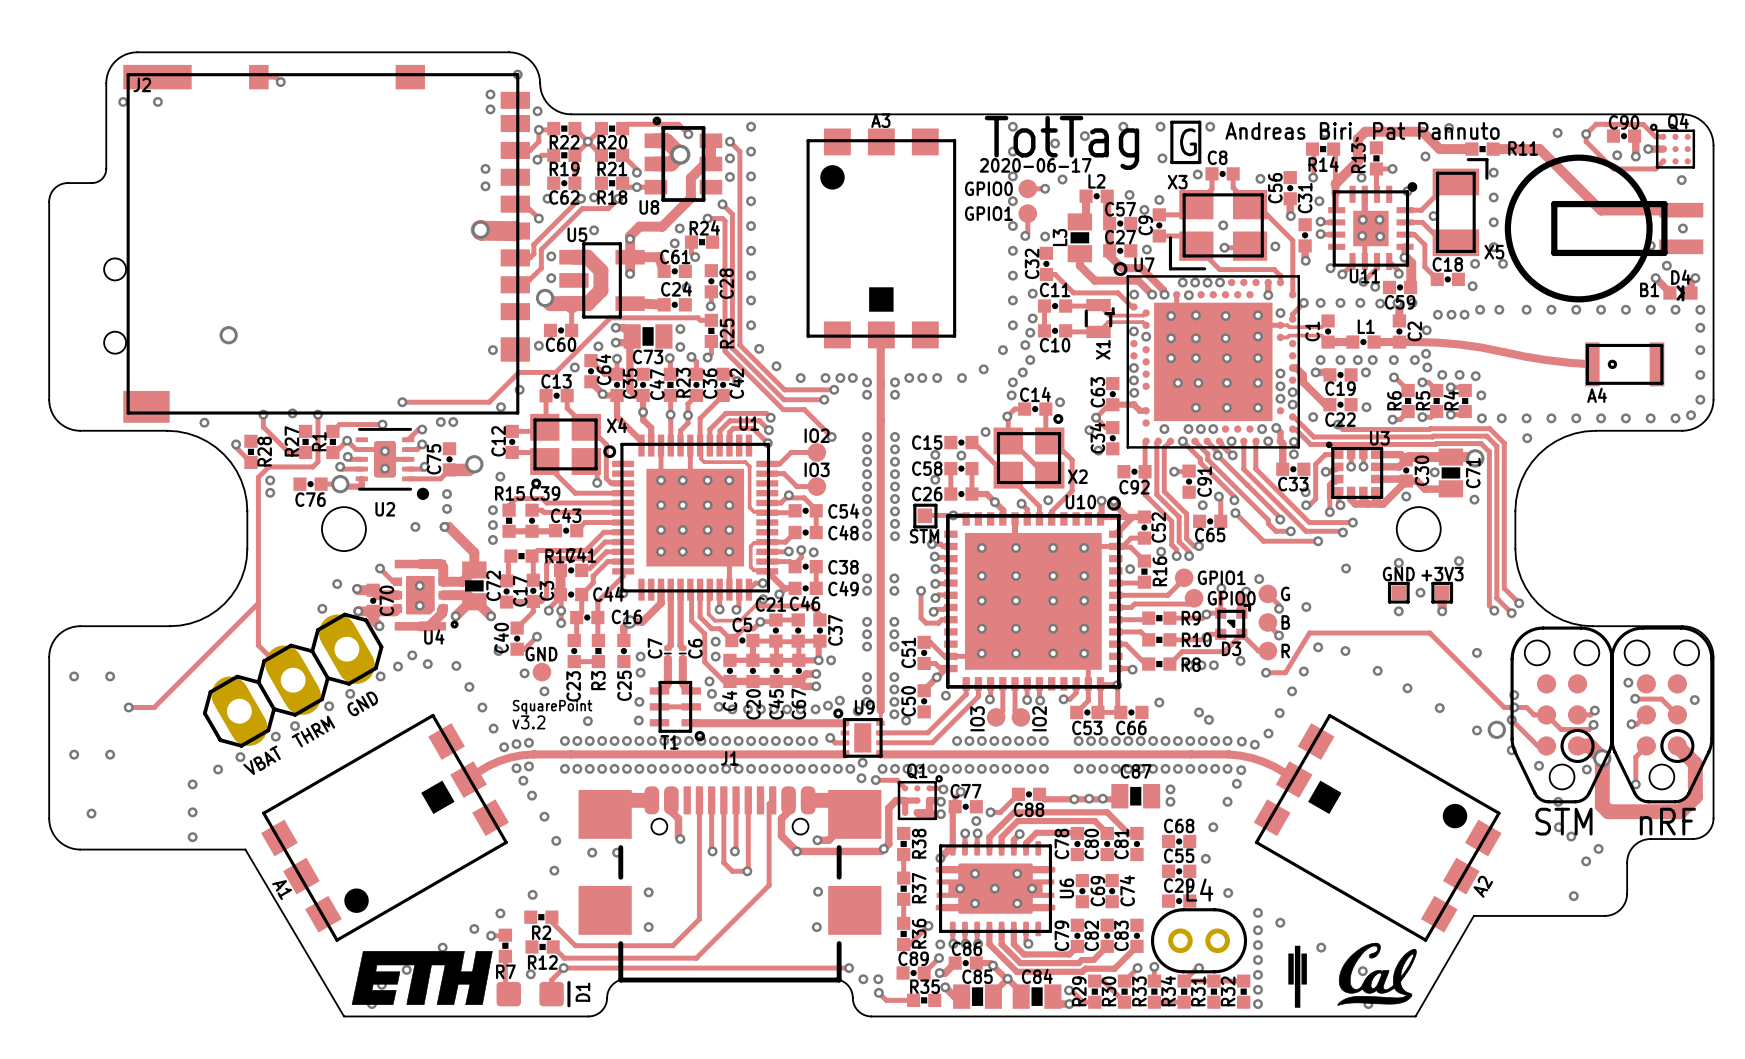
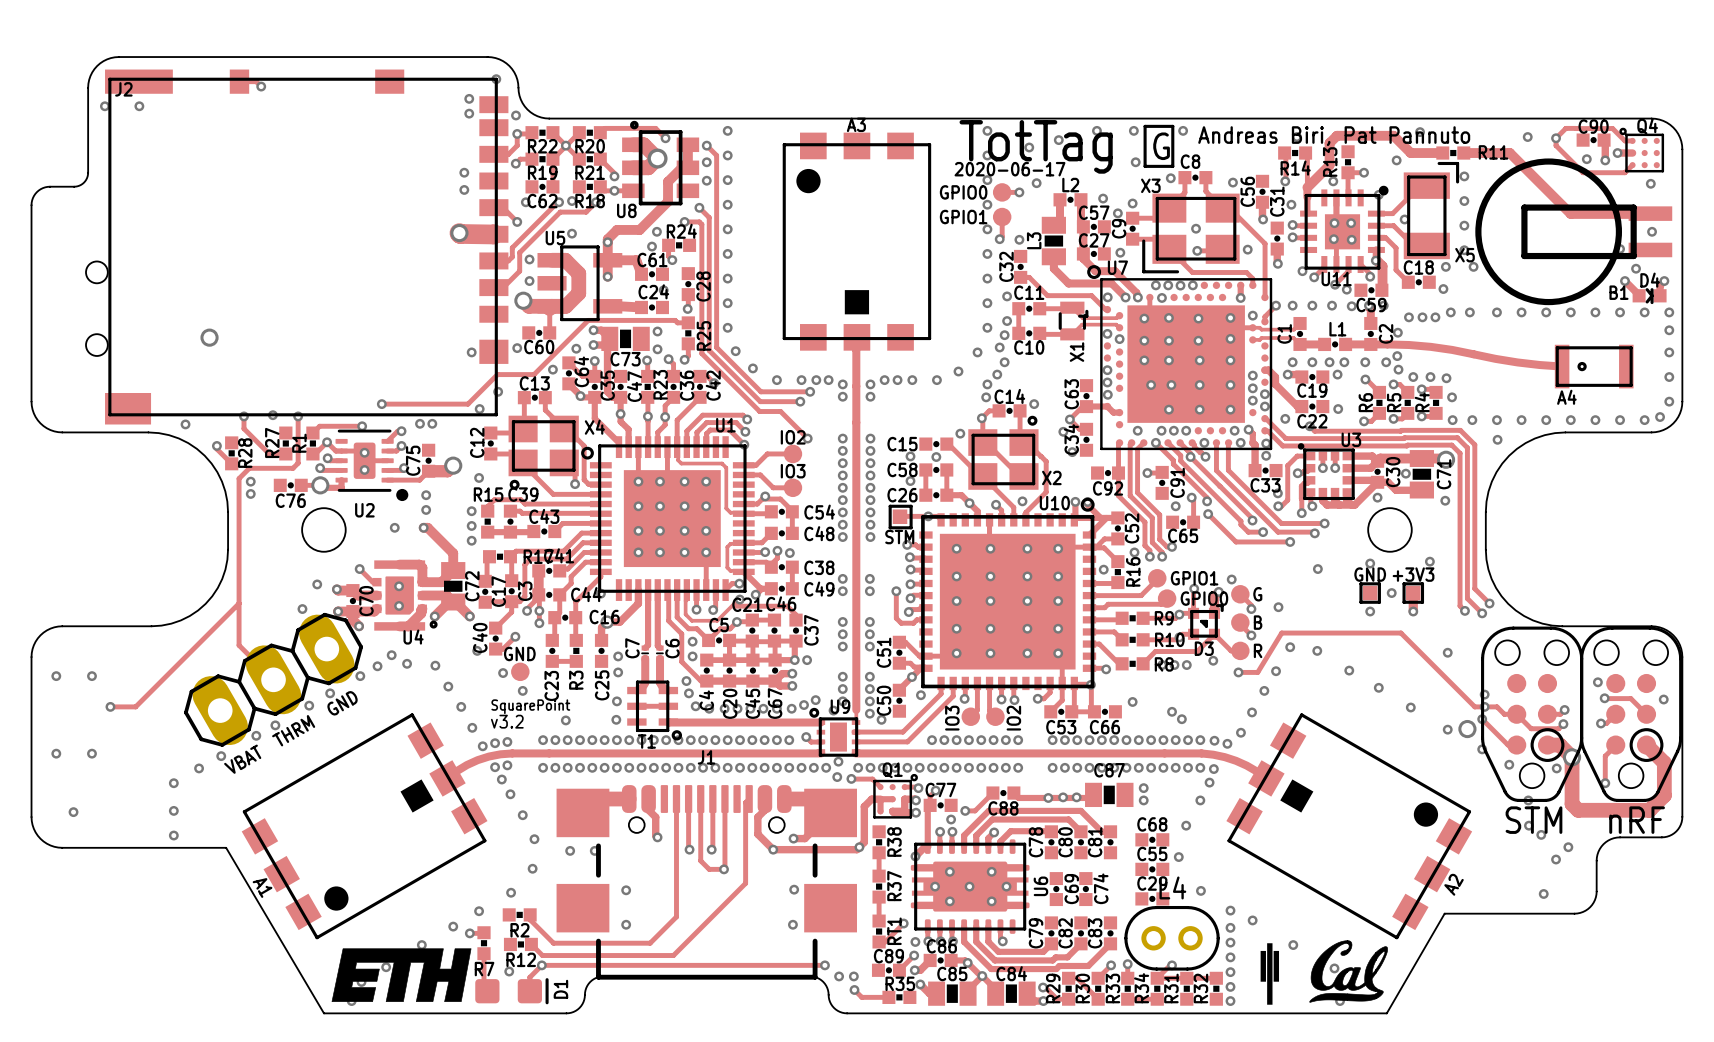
R36 name: R36 (919, 933) -> RT1 (894, 931)

